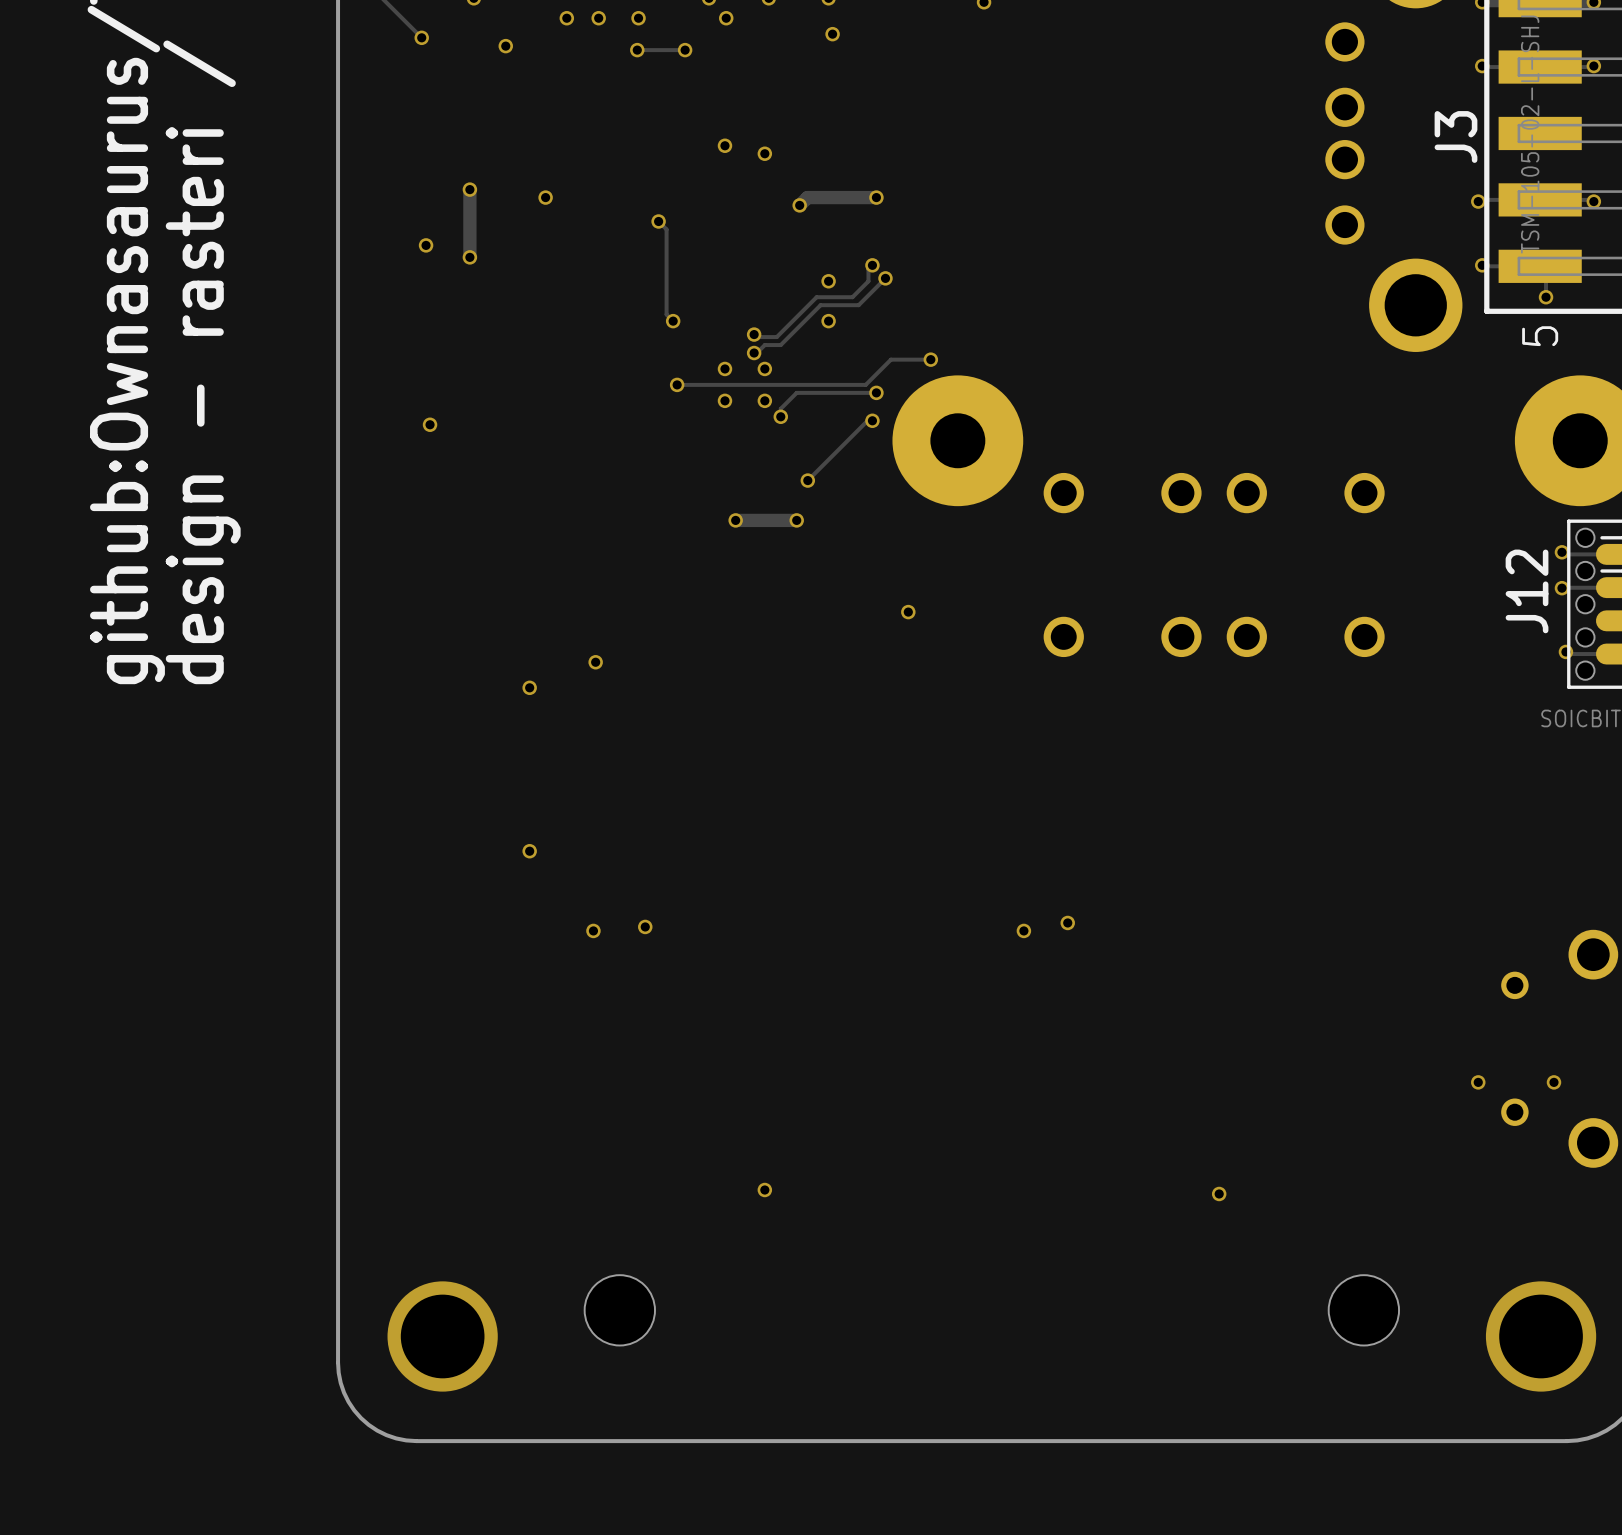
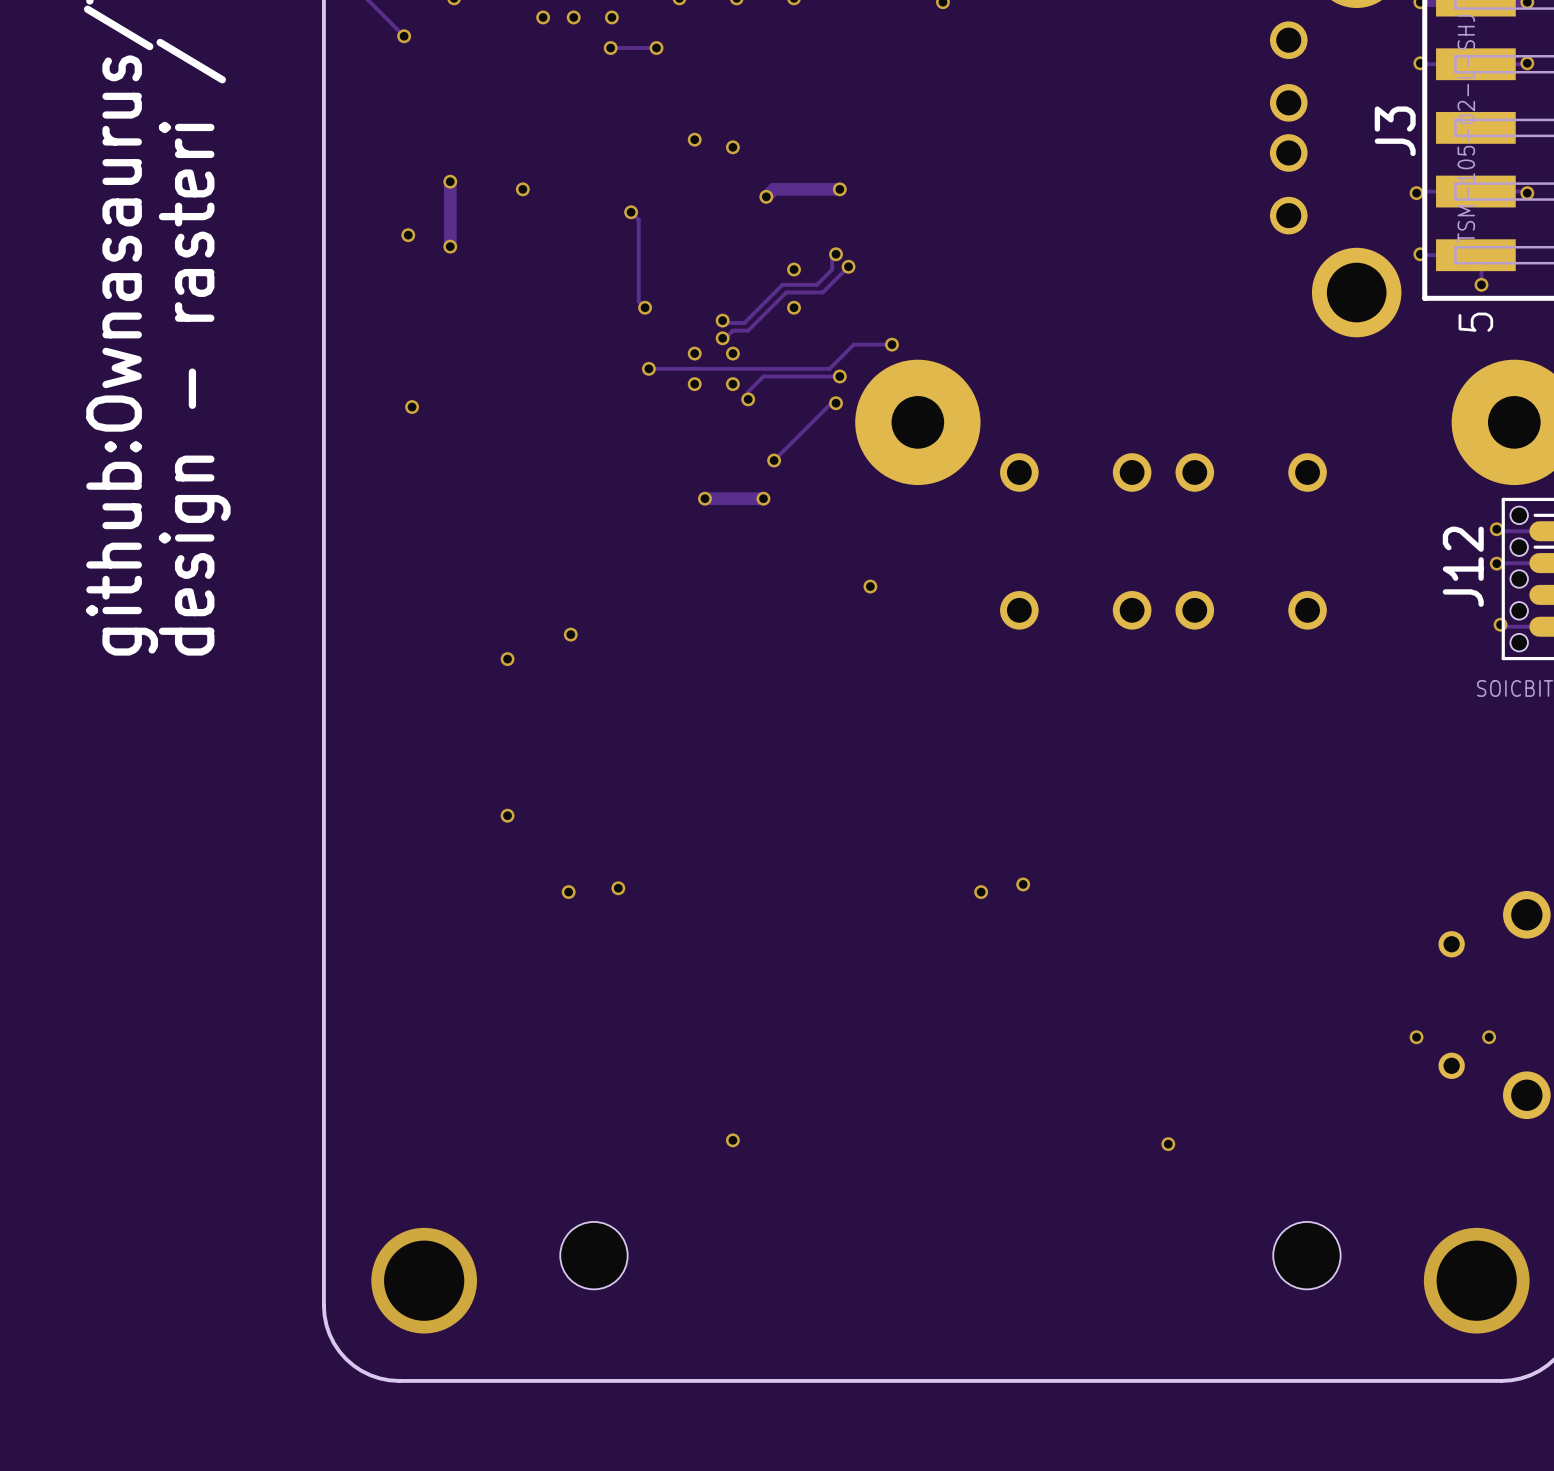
via: (726, 18) -> none
via: (832, 34) -> none
via: (505, 46) -> none

